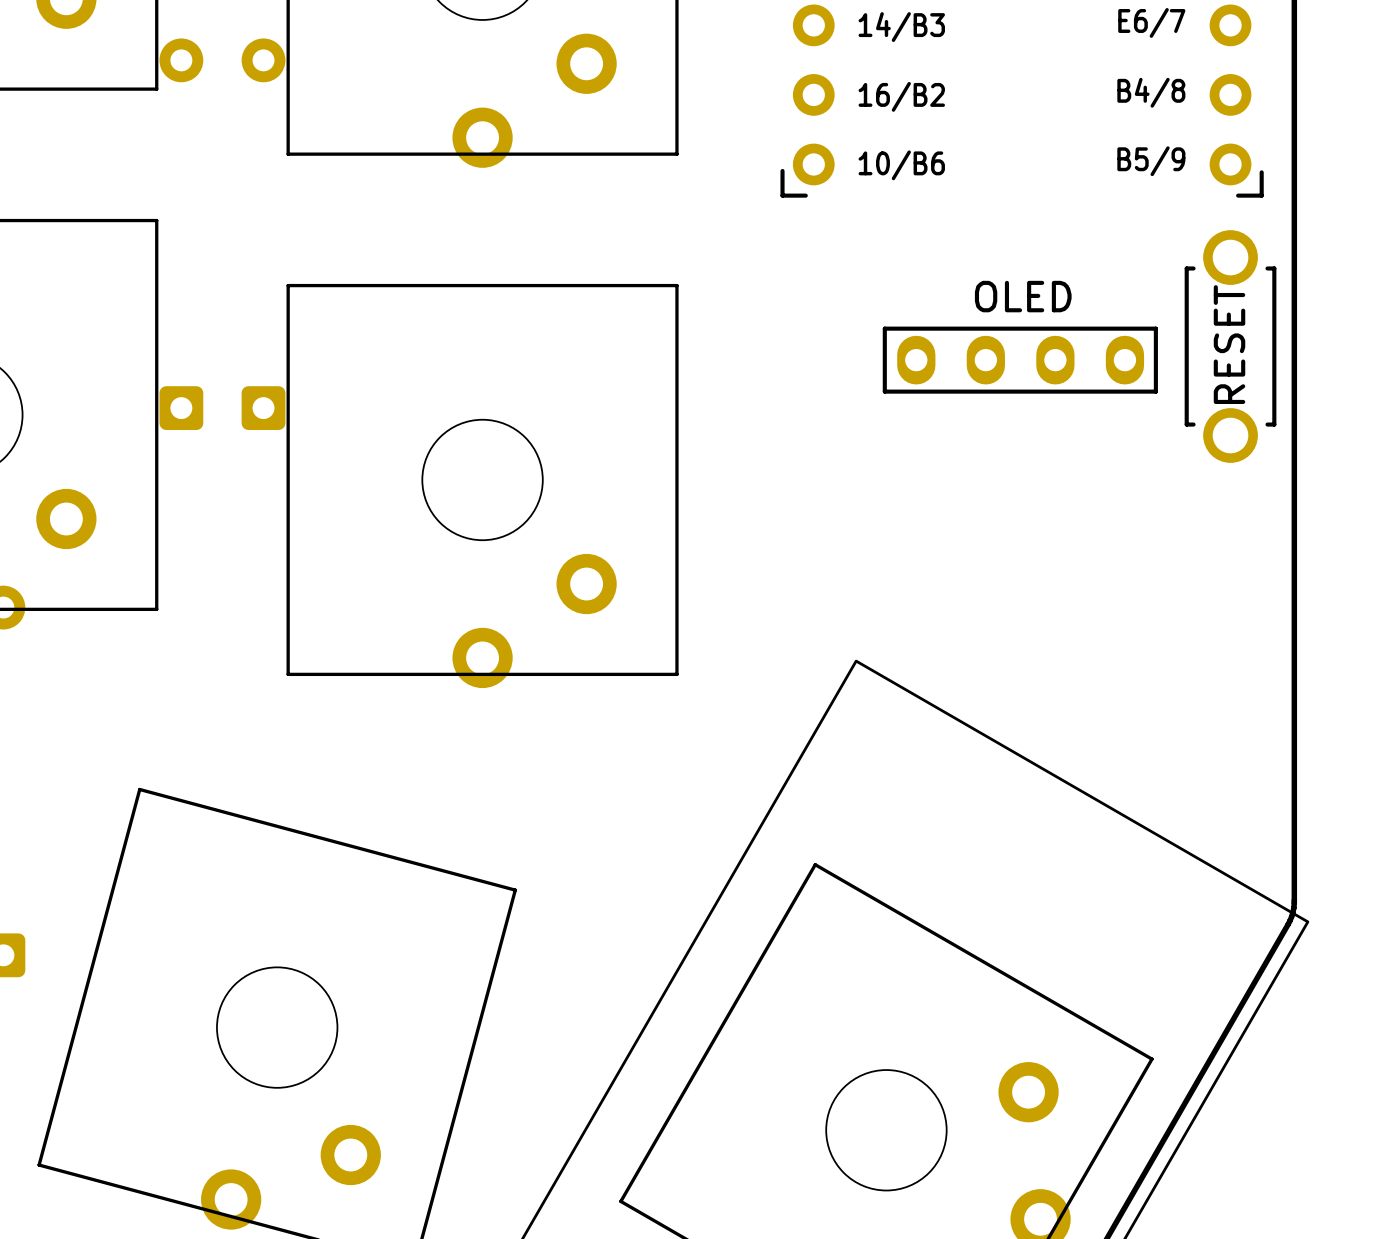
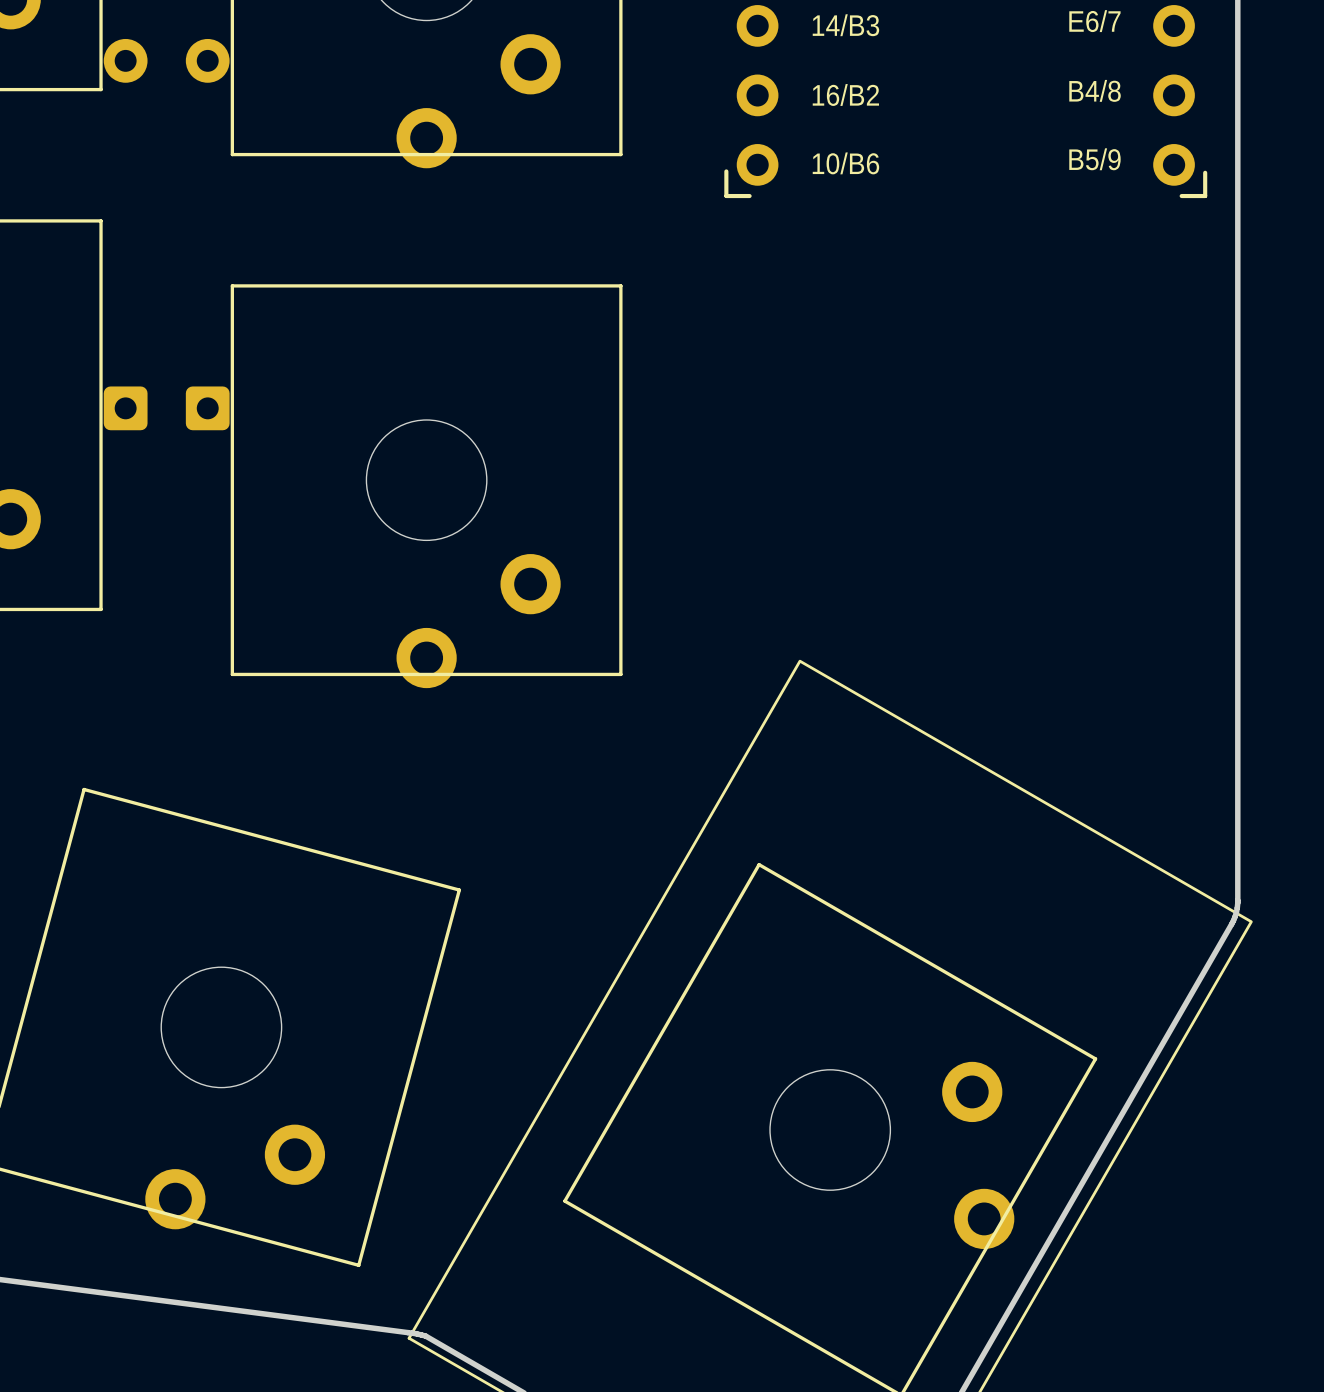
part: (1230, 346) -> none
part: (1020, 360) -> none

